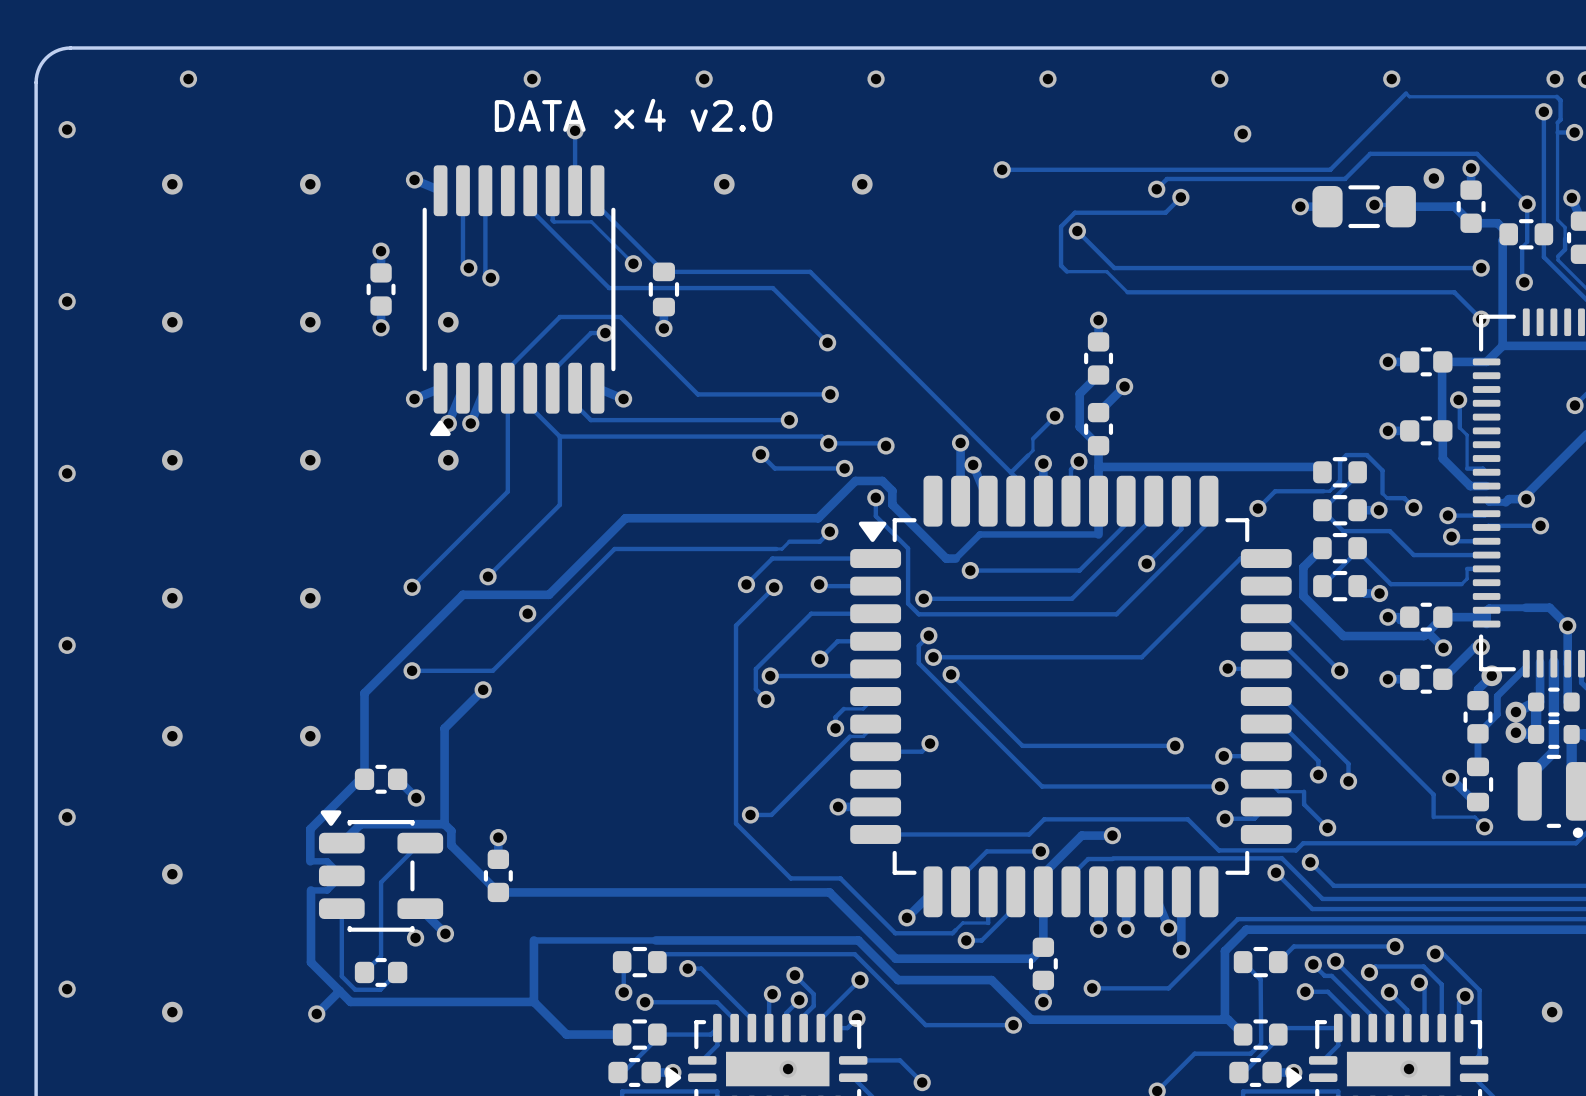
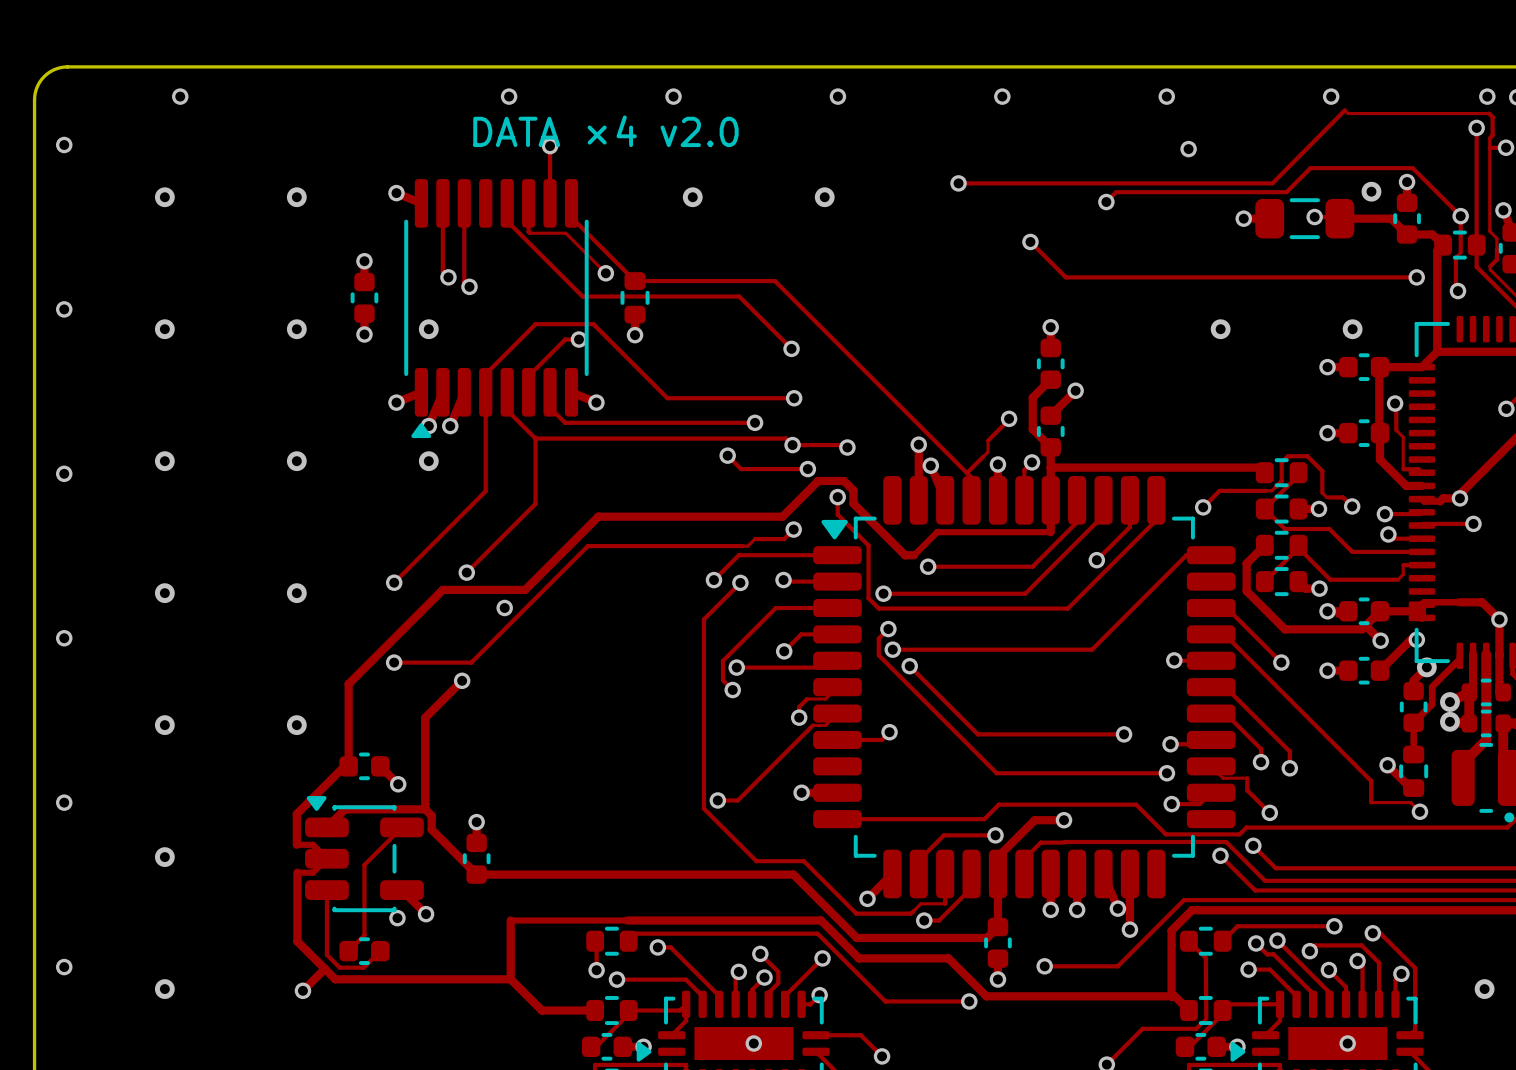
track: (1180, 197) (1165, 212) (1074, 212) (1061, 226) (1061, 265) (1066, 271) (1106, 271) (1127, 292) (1454, 292) (1481, 319) -> none
via: (1180, 197) -> none
via: (1481, 319) -> none
via: none -> (1220, 329)
via: none -> (1352, 329)

